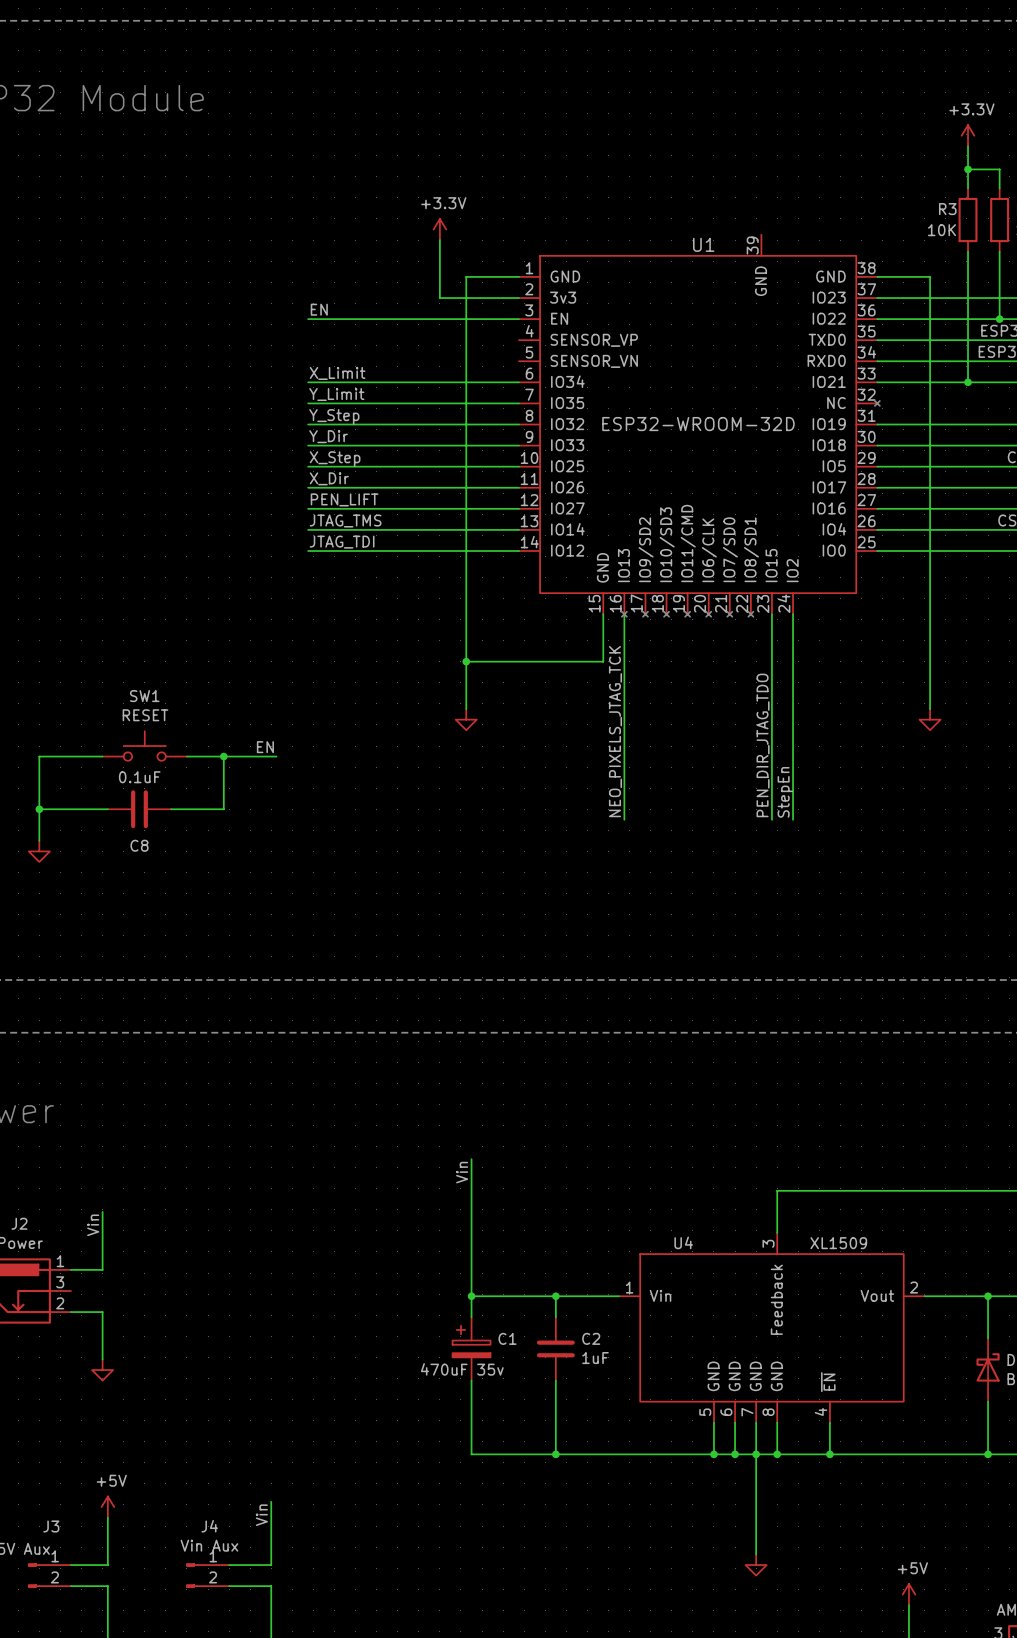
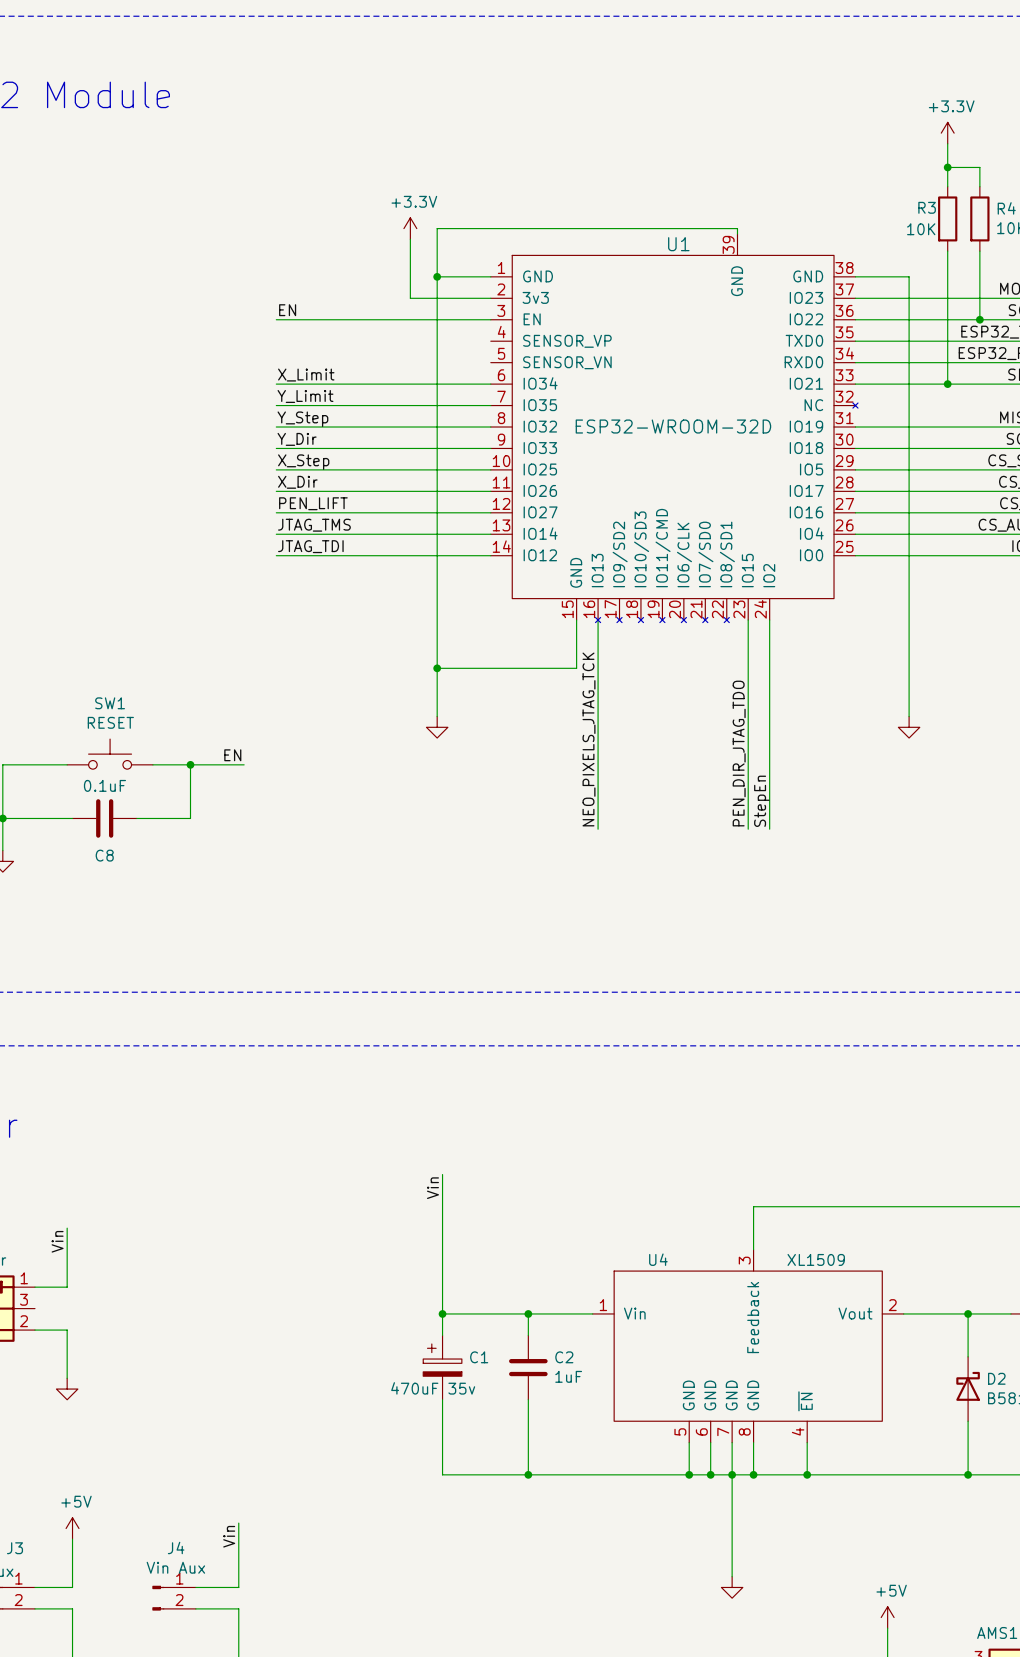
wire: none -> (737, 233) (737, 228) (437, 228) (437, 276)
junction: none -> (437, 276)

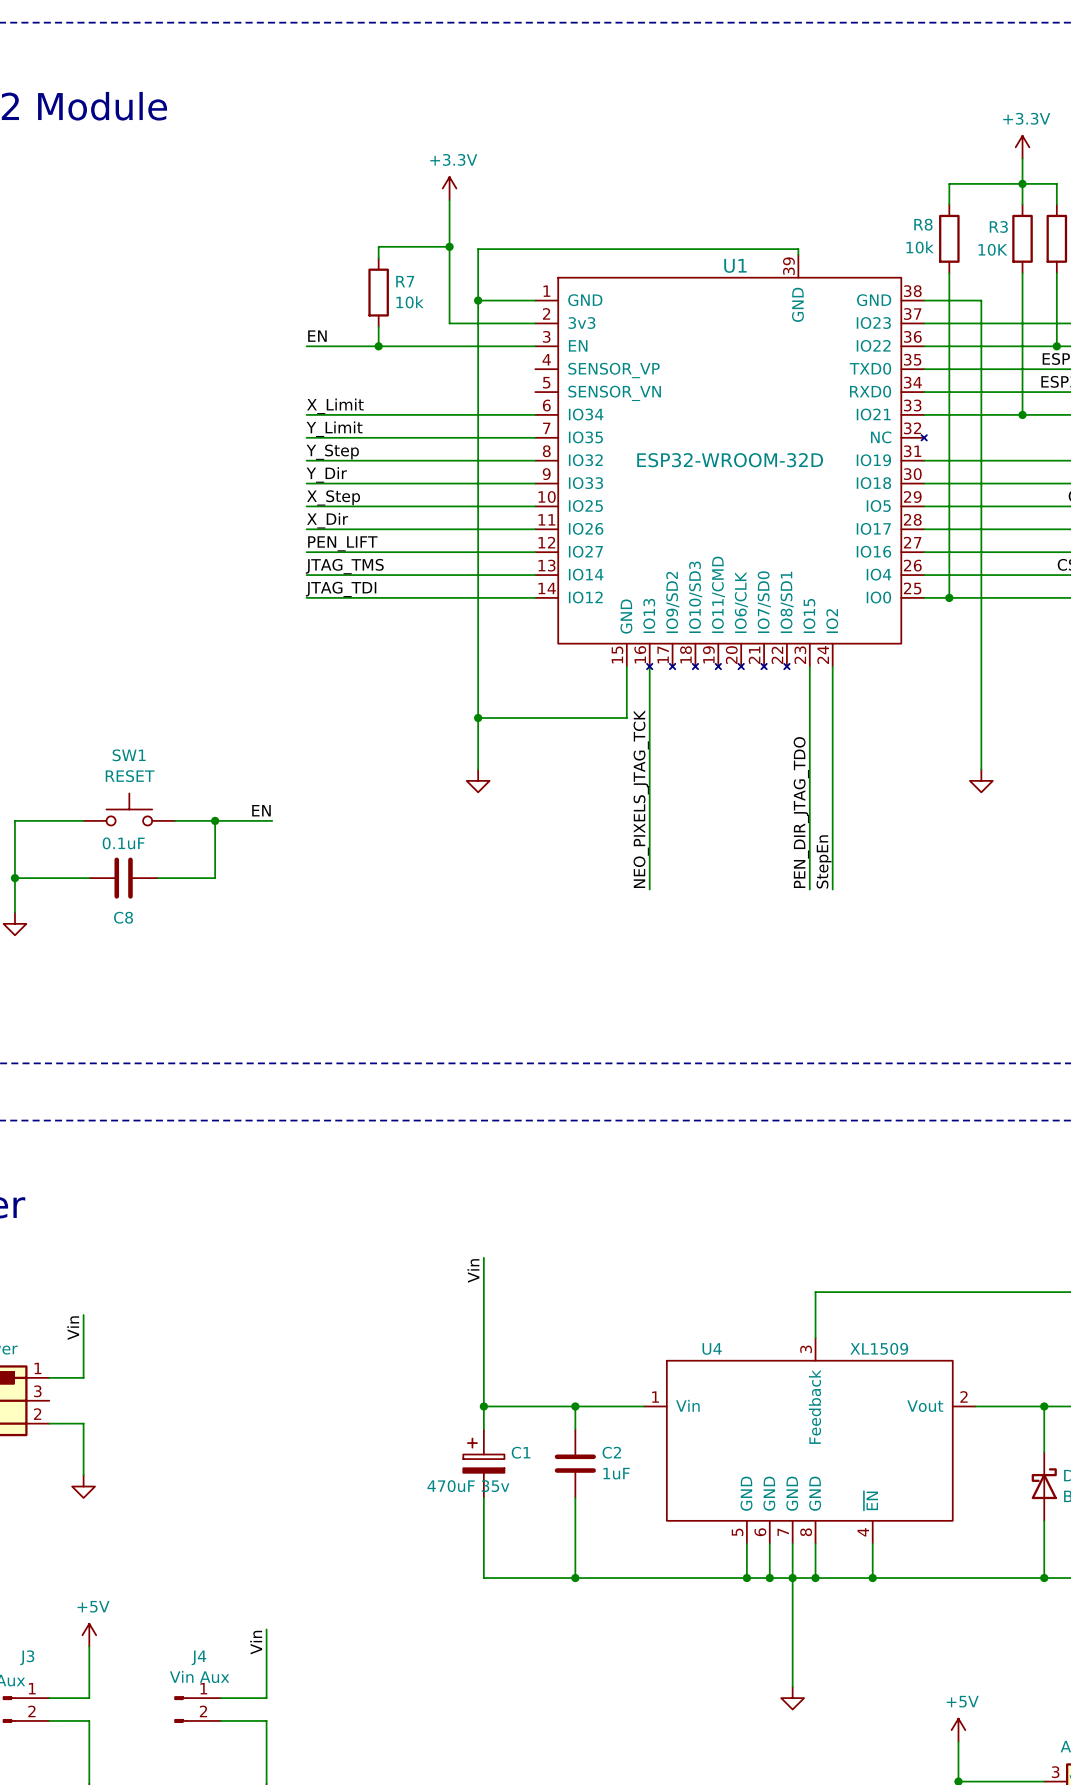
wire: none -> (1022, 183) (949, 183) (949, 204)
wire: none -> (449, 199) (449, 260)
R8: none -> 10k (949, 238)
wire: none -> (449, 246) (378, 246) (378, 258)
junction: none -> (449, 246)
power symbol position: +3.3V (410, 228) -> +3.3V (449, 188)
wire: none -> (949, 273) (949, 597)
R7: none -> 10k (378, 292)
wire: none -> (378, 326) (378, 346)
junction: none -> (378, 346)
junction: none -> (949, 597)

